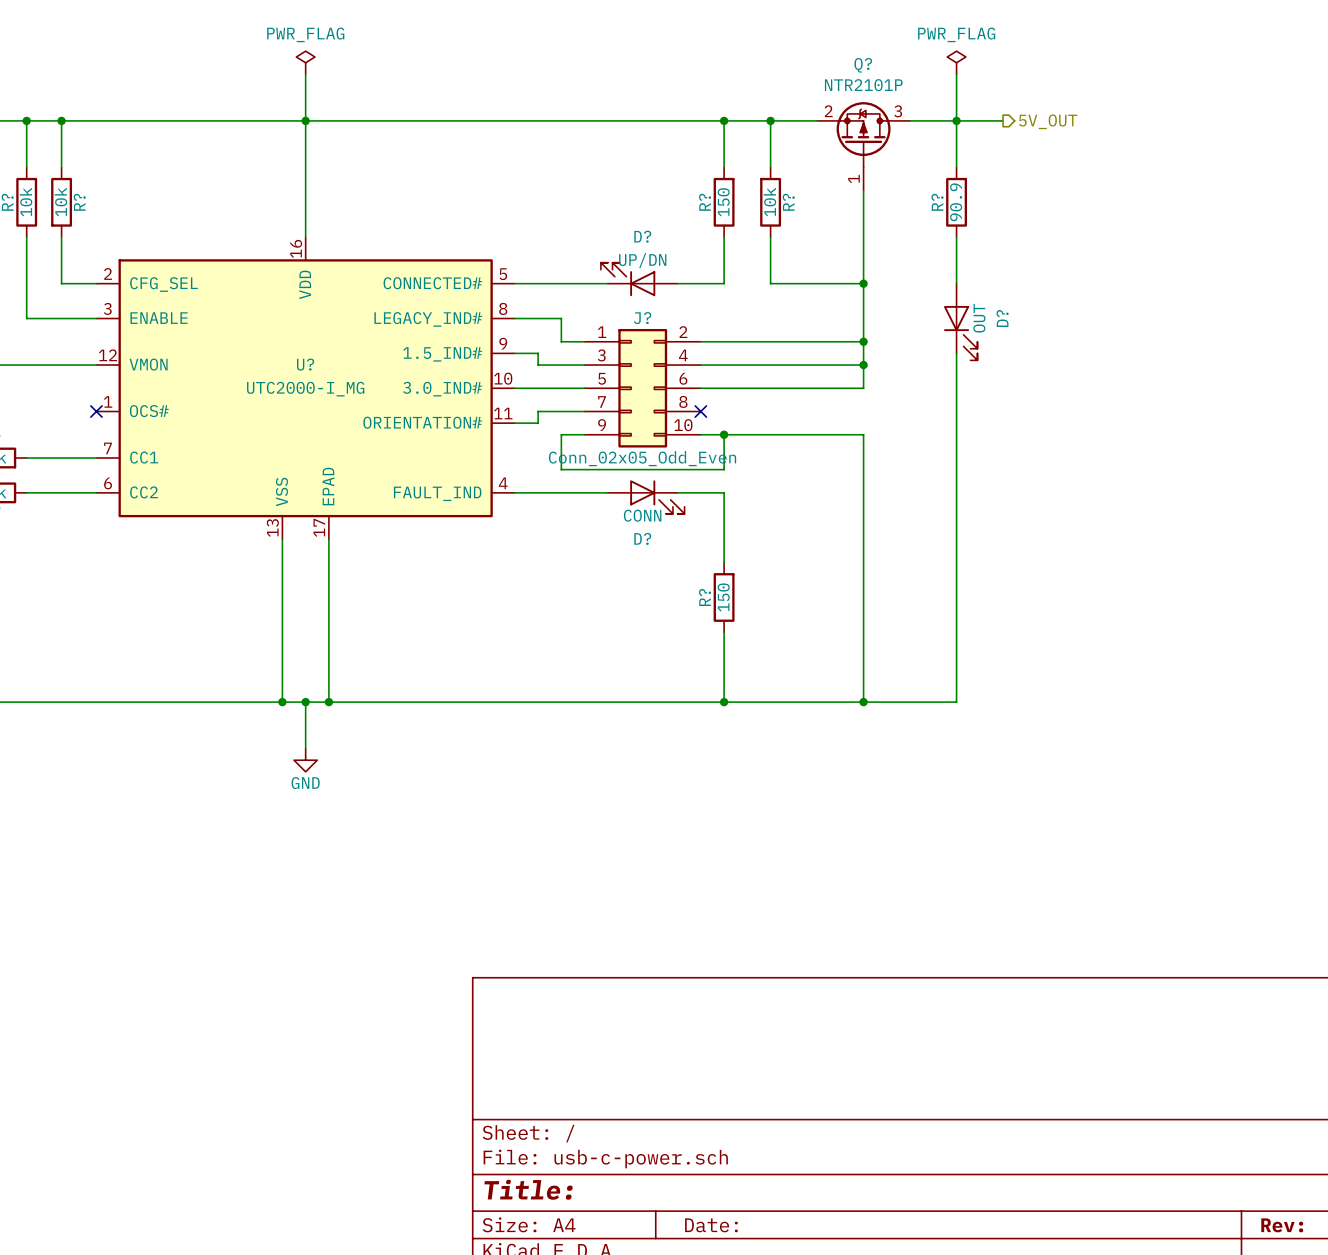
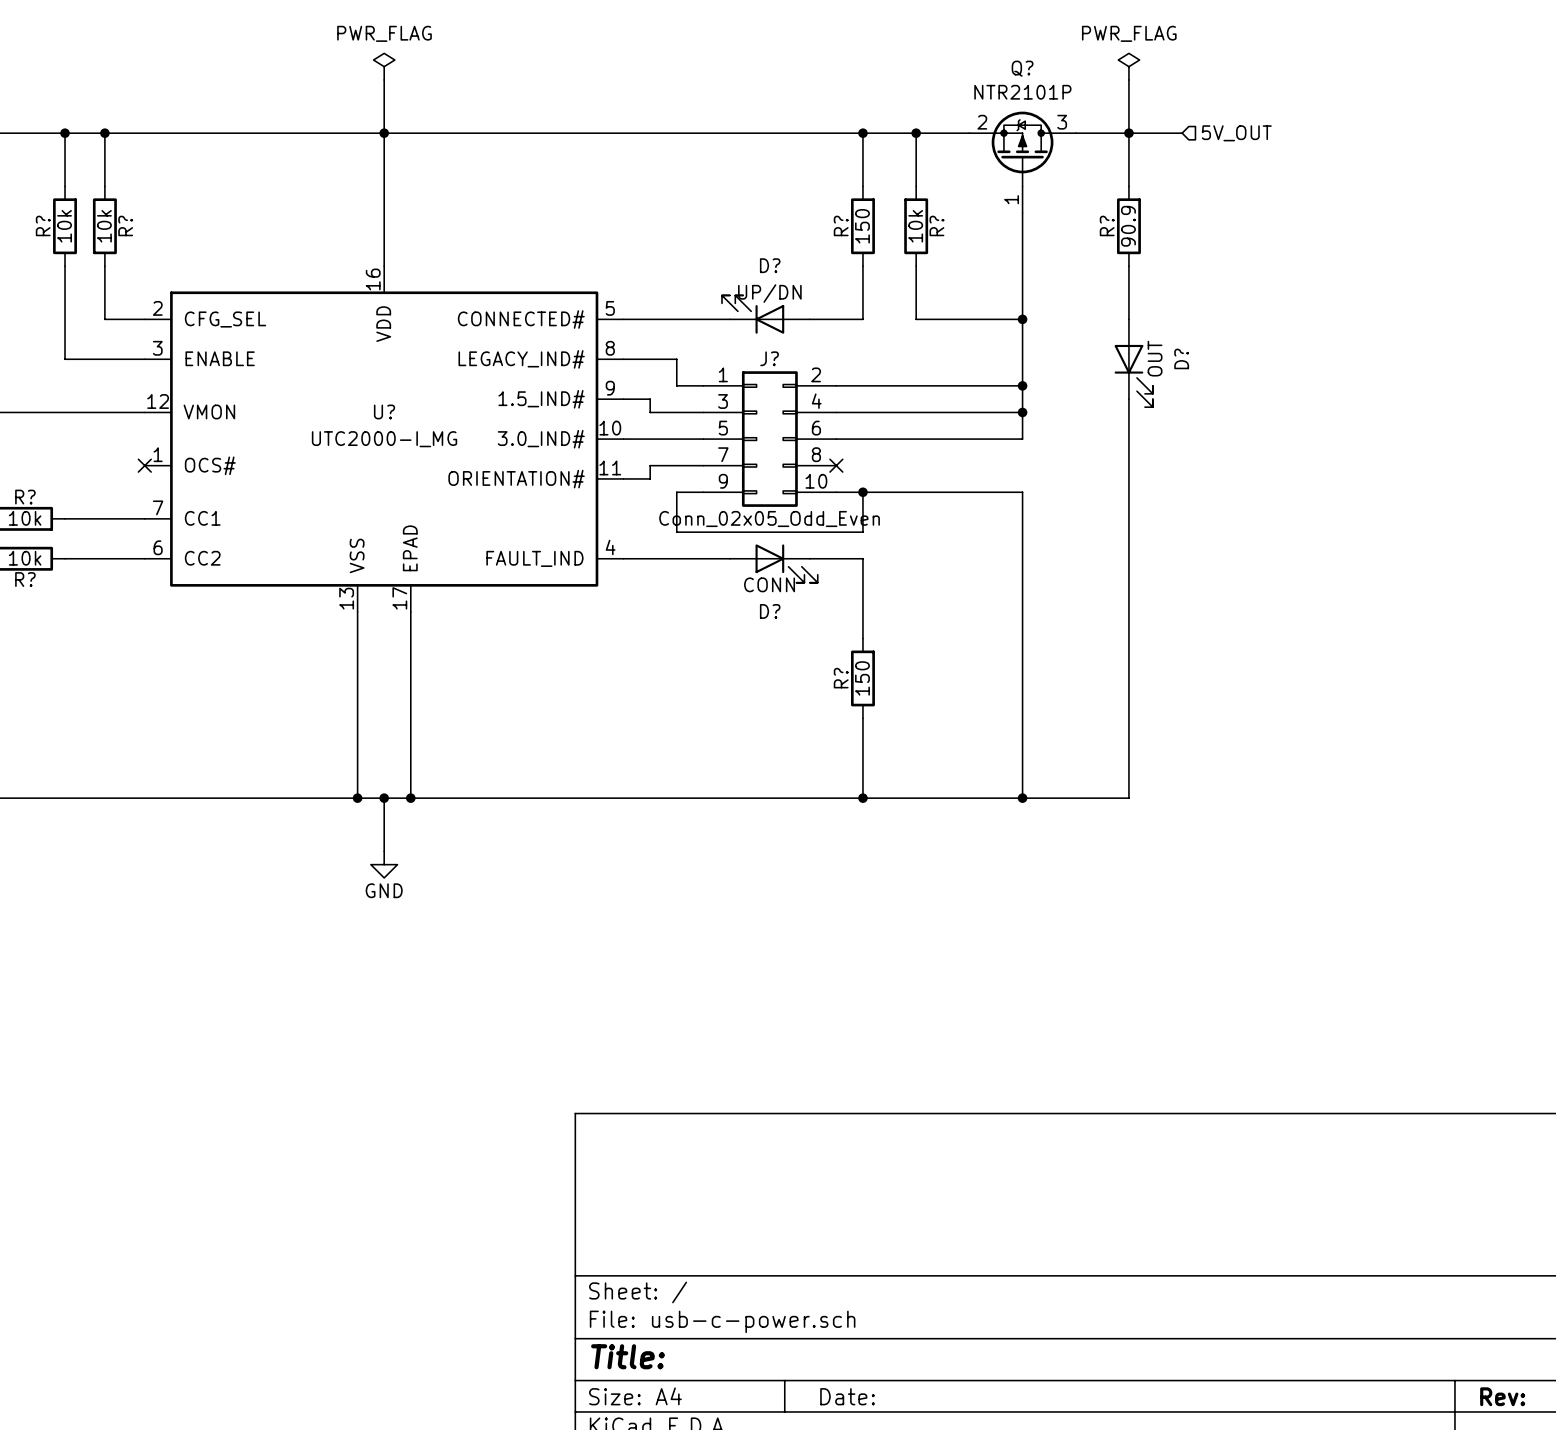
hierarchical label shape: output (1048, 121) -> input (1236, 133)

